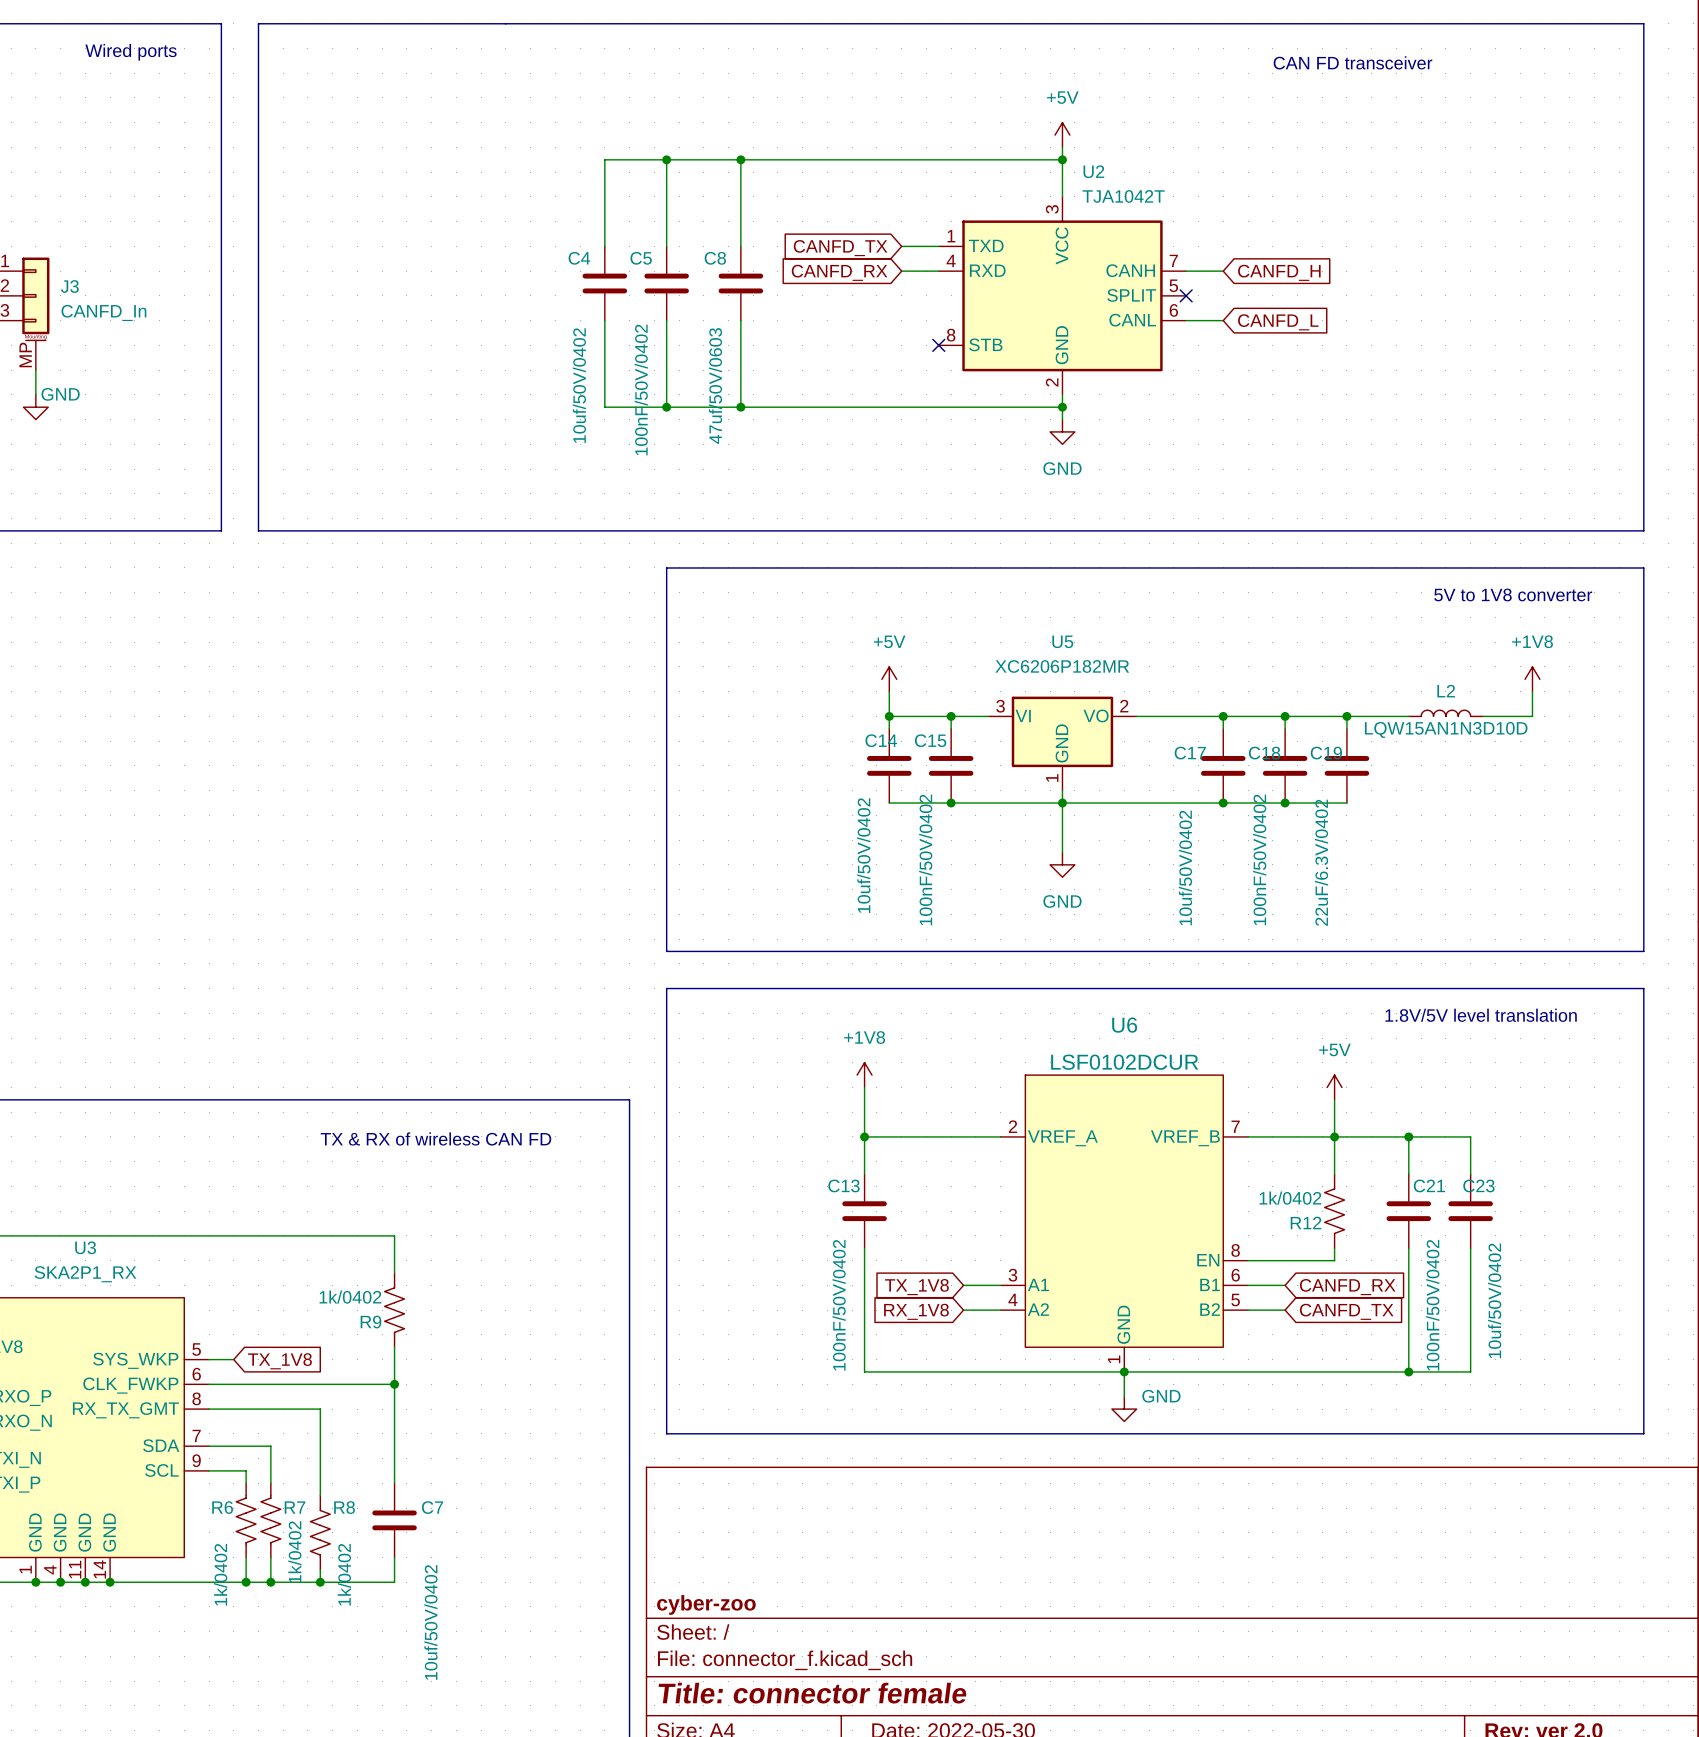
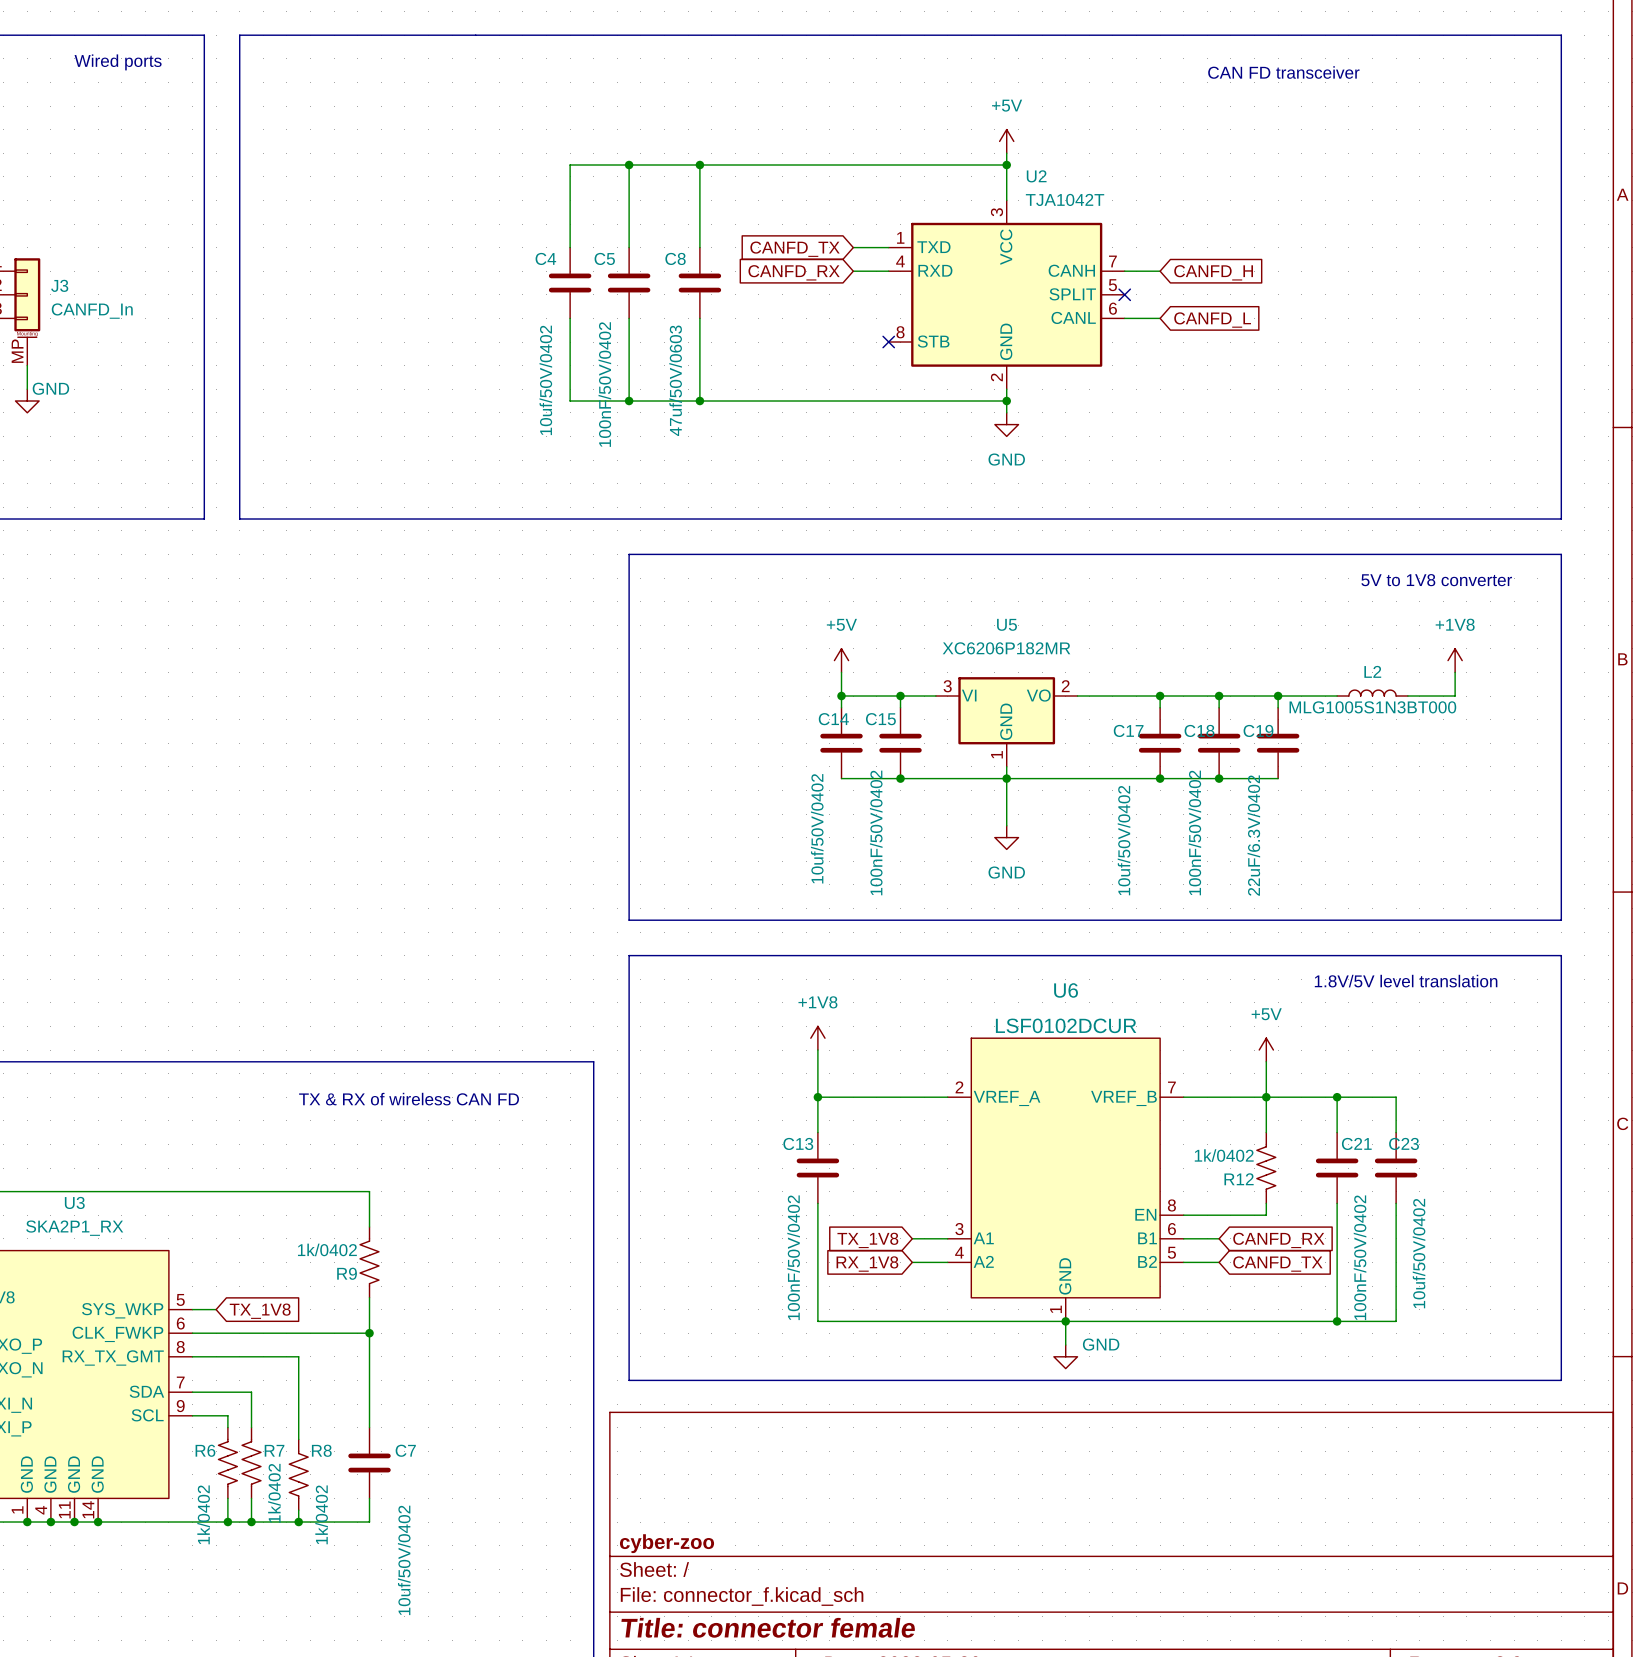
L2 value: LQW15AN1N3D10D (1446, 729) -> MLG1005S1N3BT000 (1372, 707)

